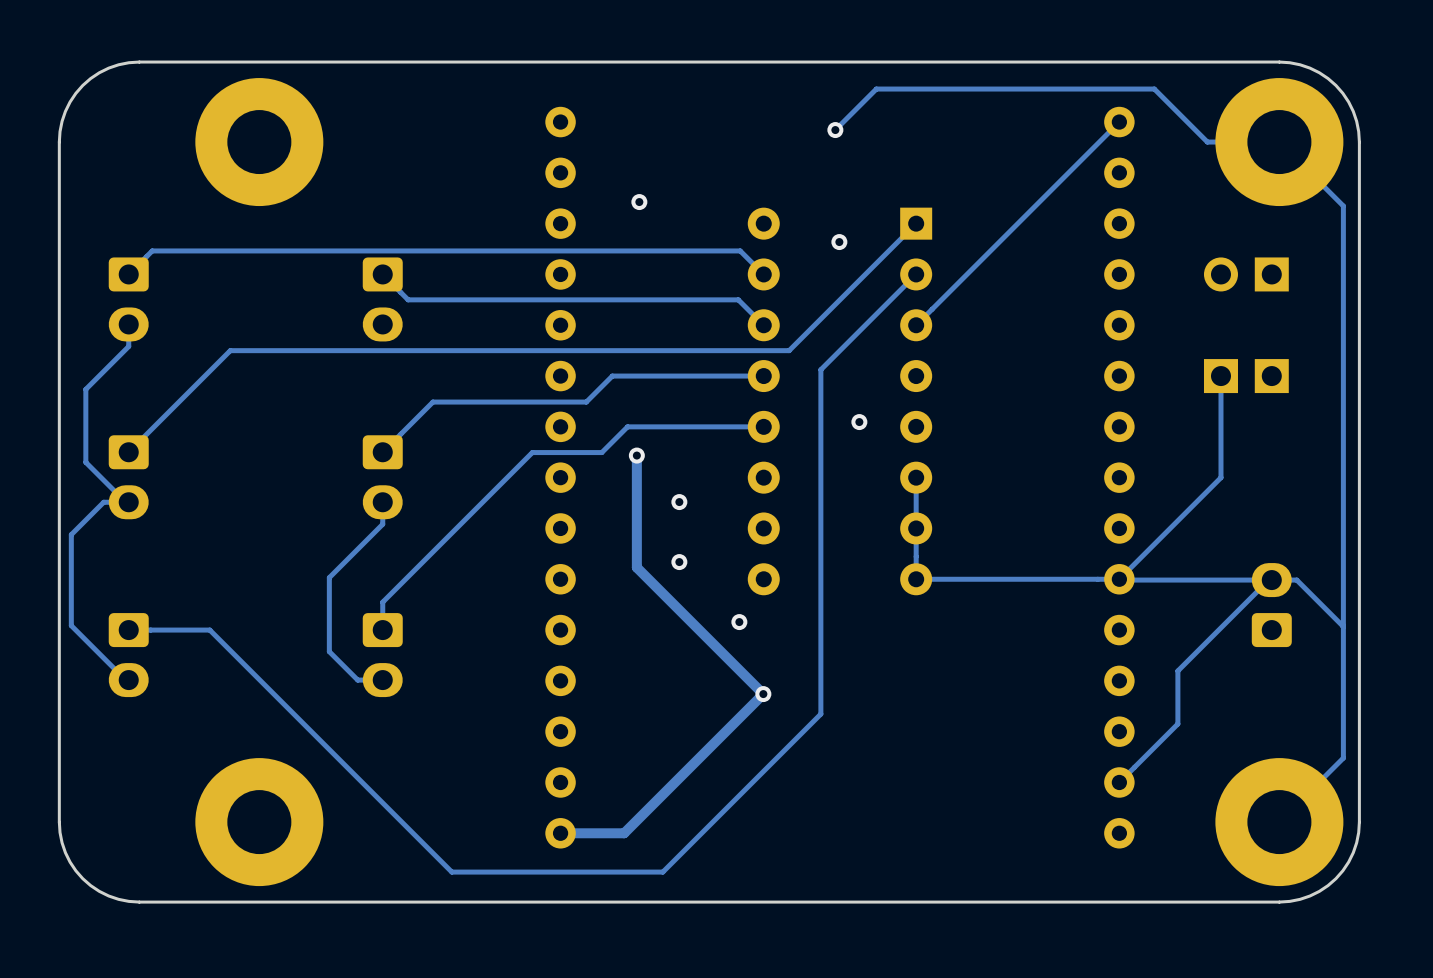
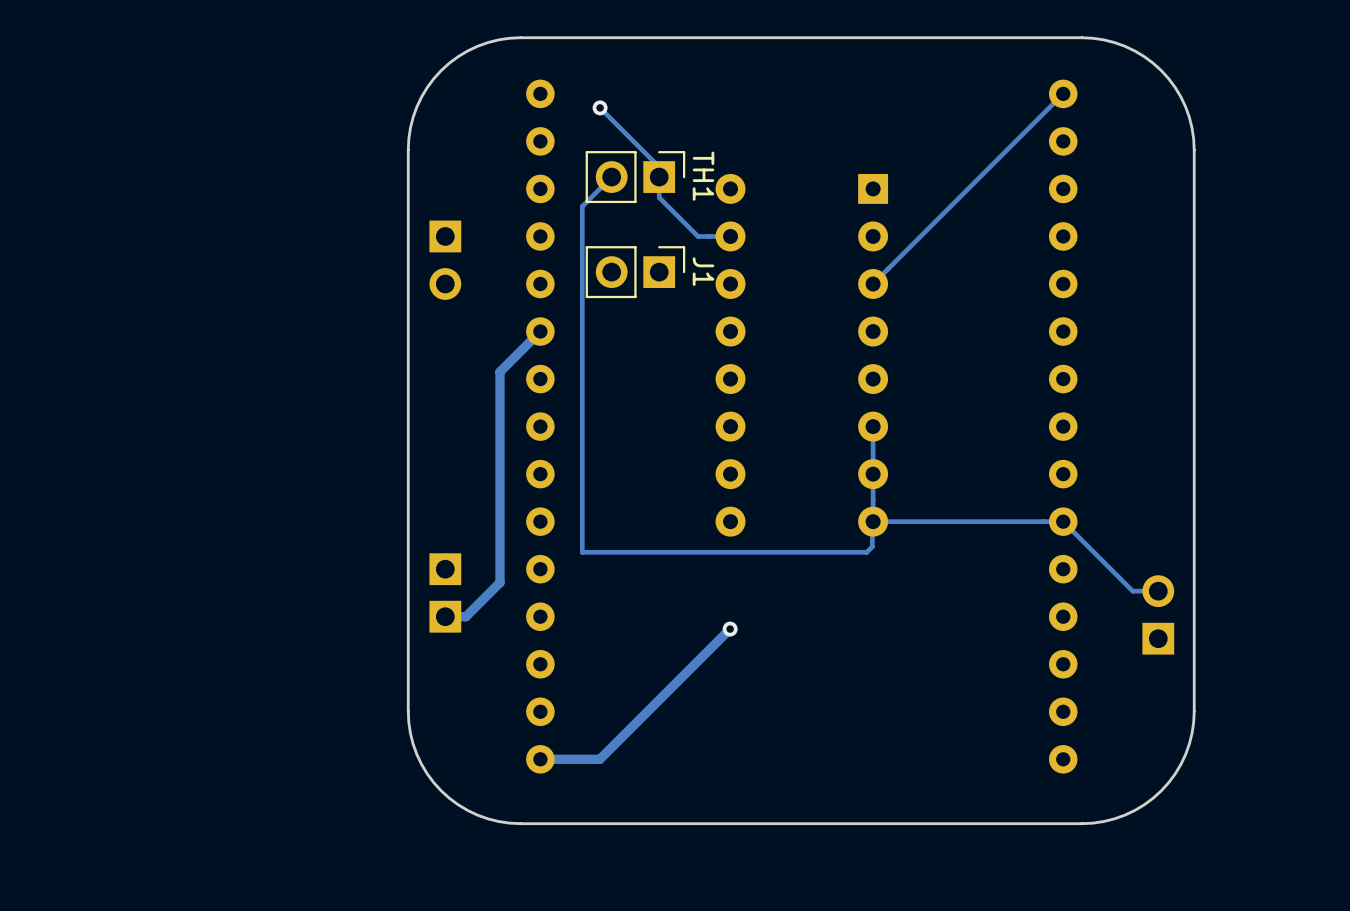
board edge: (539, 62) (128, 62) (108, 68) (82, 85) (65, 111) (59, 142) (59, 822) (62, 842) (70, 862) (90, 885) (108, 895) (128, 901) (539, 902) -> (520, 37) (498, 39) (477, 46) (458, 56) (441, 70) (427, 87) (416, 107) (410, 128) (408, 150) (408, 711) (410, 733) (416, 754) (427, 773) (449, 798) (467, 810) (487, 818) (520, 823)
board edge: (1139, 62) (1279, 62) (1310, 68) (1328, 78) (1342, 93) (1356, 121) (1359, 142) (1359, 822) (1356, 842) (1348, 862) (1335, 878) (1319, 891) (1300, 899) (1279, 902) (1139, 902) -> (1081, 37) (1103, 39) (1124, 46) (1144, 56) (1161, 70) (1175, 87) (1185, 107) (1192, 128) (1194, 150) (1194, 711) (1192, 733) (1185, 754) (1175, 773) (1153, 798) (1134, 810) (1114, 818) (1081, 823)
track: (835, 130) (876, 89) (1154, 89) (1207, 142) (1279, 142) (1343, 206) (1342, 626) -> none
via: (835, 130) -> none
part: (259, 142) -> none
part: (1279, 142) -> none
via position: (639, 202) -> (600, 107)
track: none -> (611, 177) (582, 206) (582, 552) (866, 552) (872, 546) (873, 521)
TH1: none -> (635, 177)
track: (916, 223) (789, 350) (230, 350) (128, 452) -> none
via: (839, 242) -> none
track: (382, 274) (408, 299) (738, 299) (763, 325) -> none
track: (763, 274) (740, 250) (152, 250) (128, 274) -> (730, 236) (698, 236) (659, 197) (659, 167) (600, 107)
track: (916, 274) (820, 369) (820, 714) (662, 872) (451, 872) (209, 630) (128, 630) -> none
part: (1246, 274) -> none
part: (128, 299) -> none
part: (382, 299) -> none
part: none -> (445, 260)
J1: none -> (635, 272)
track: (128, 324) (128, 346) (85, 389) (85, 462) (125, 502) -> none
track: none -> (540, 331) (499, 371) (499, 582) (465, 616) (445, 616)
track: (763, 376) (612, 376) (586, 402) (432, 402) (382, 452) -> none
track: (1220, 376) (1220, 477) (1119, 579) -> none
part: (1220, 376) -> none
part: (1271, 376) -> none
via: (859, 422) -> none
track: (763, 426) (627, 426) (601, 452) (532, 452) (382, 602) (382, 630) -> none
track: (636, 455) (636, 567) (763, 694) -> none
via: (636, 455) -> none
part: (128, 477) -> none
part: (382, 477) -> none
track: (128, 502) (103, 502) (71, 534) (71, 625) (125, 680) (128, 680) -> none
track: (382, 502) (382, 524) (329, 577) (329, 651) (357, 680) (382, 680) -> none
via: (679, 502) -> none
via: (679, 562) -> none
track: (1120, 580) (1296, 580) (1343, 626) (1343, 758) (1279, 822) -> (1063, 522) (1132, 591) (1158, 591)
track: (1268, 580) (1177, 670) (1177, 723) (1119, 782) -> none
part: (1271, 605) -> none
via: (739, 622) -> none
part: none -> (445, 569)
part: (128, 655) -> none
part: (382, 655) -> none
part: none -> (1158, 614)
part: none -> (445, 616)
part: (259, 822) -> none
part: (1279, 822) -> none

